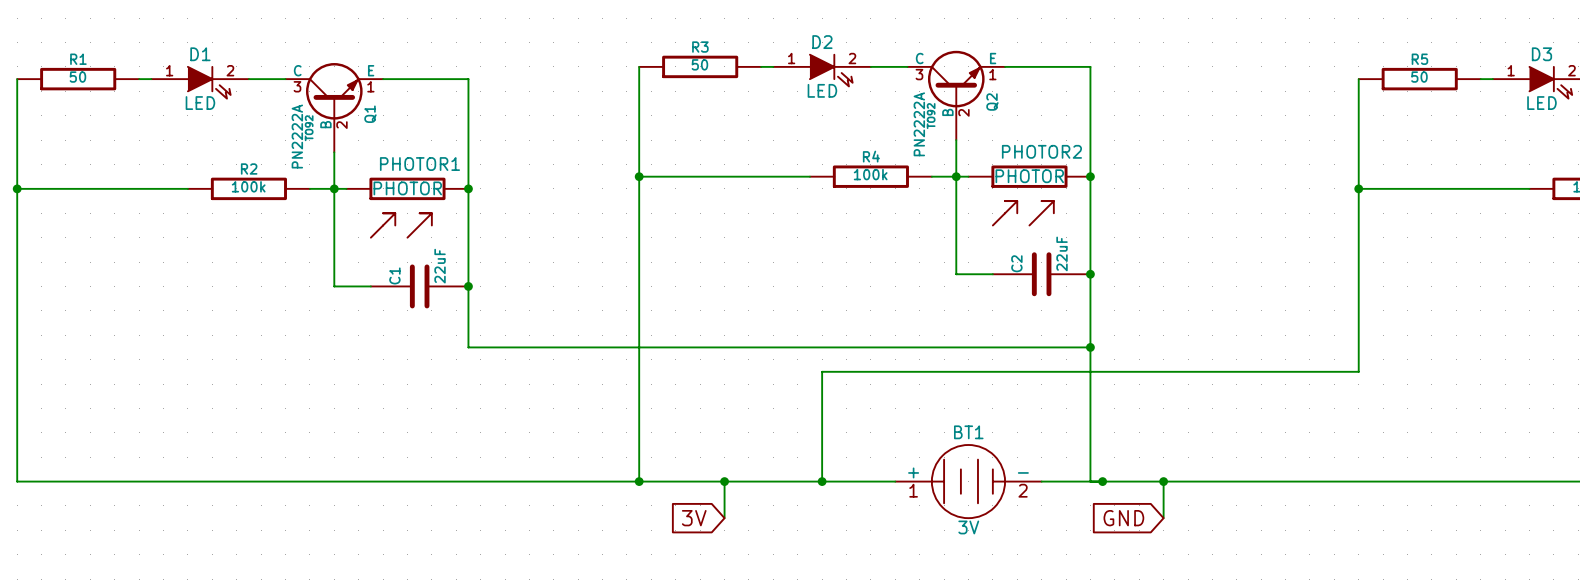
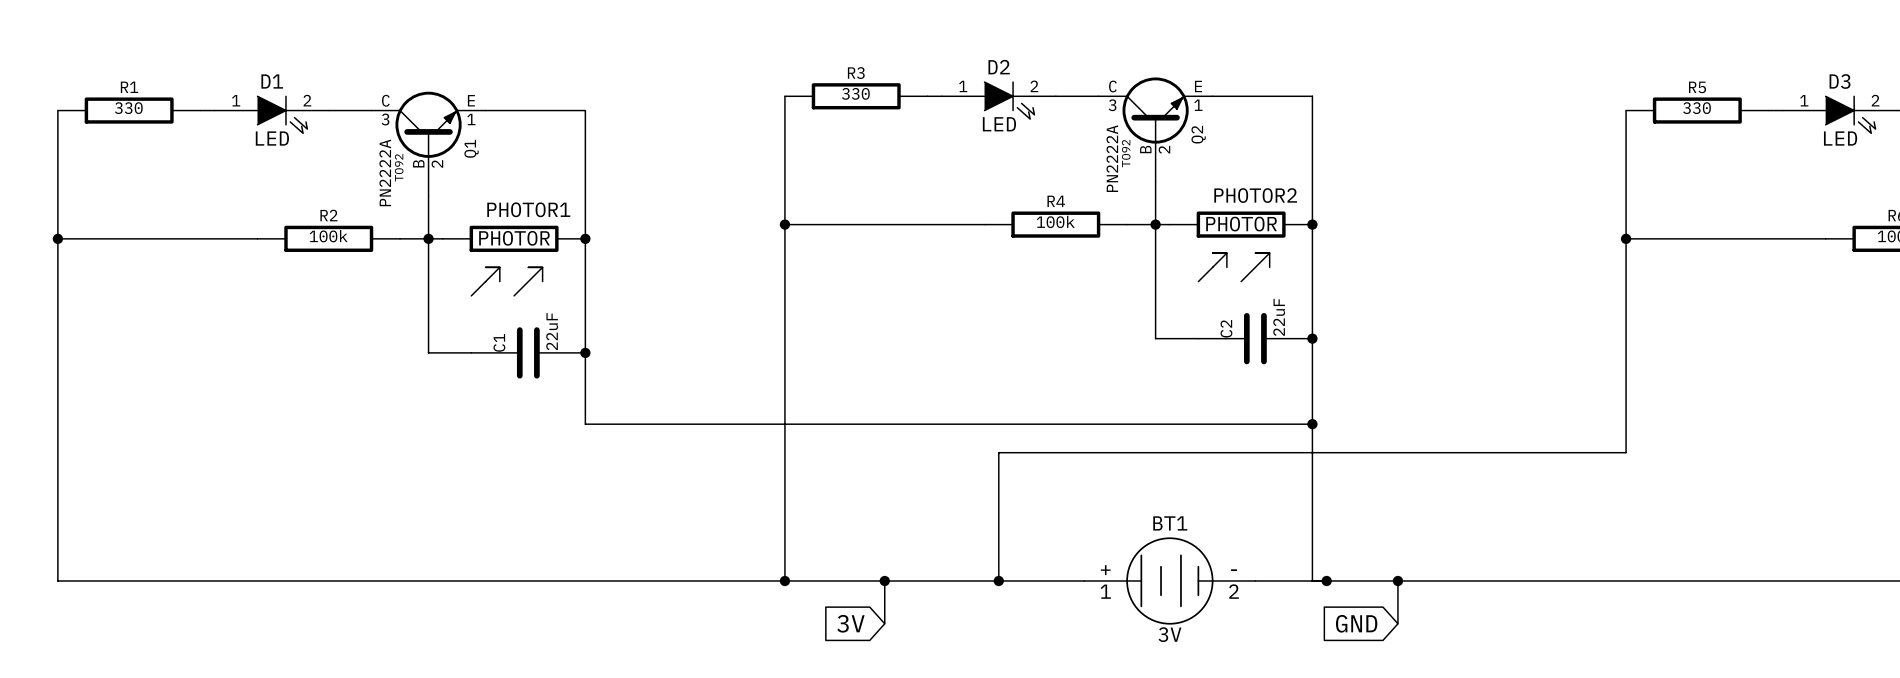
R3 value: 50 (699, 64) -> 330 (855, 93)
R1 value: 50 (77, 77) -> 330 (128, 108)
R5 value: 50 (1419, 77) -> 330 (1696, 108)

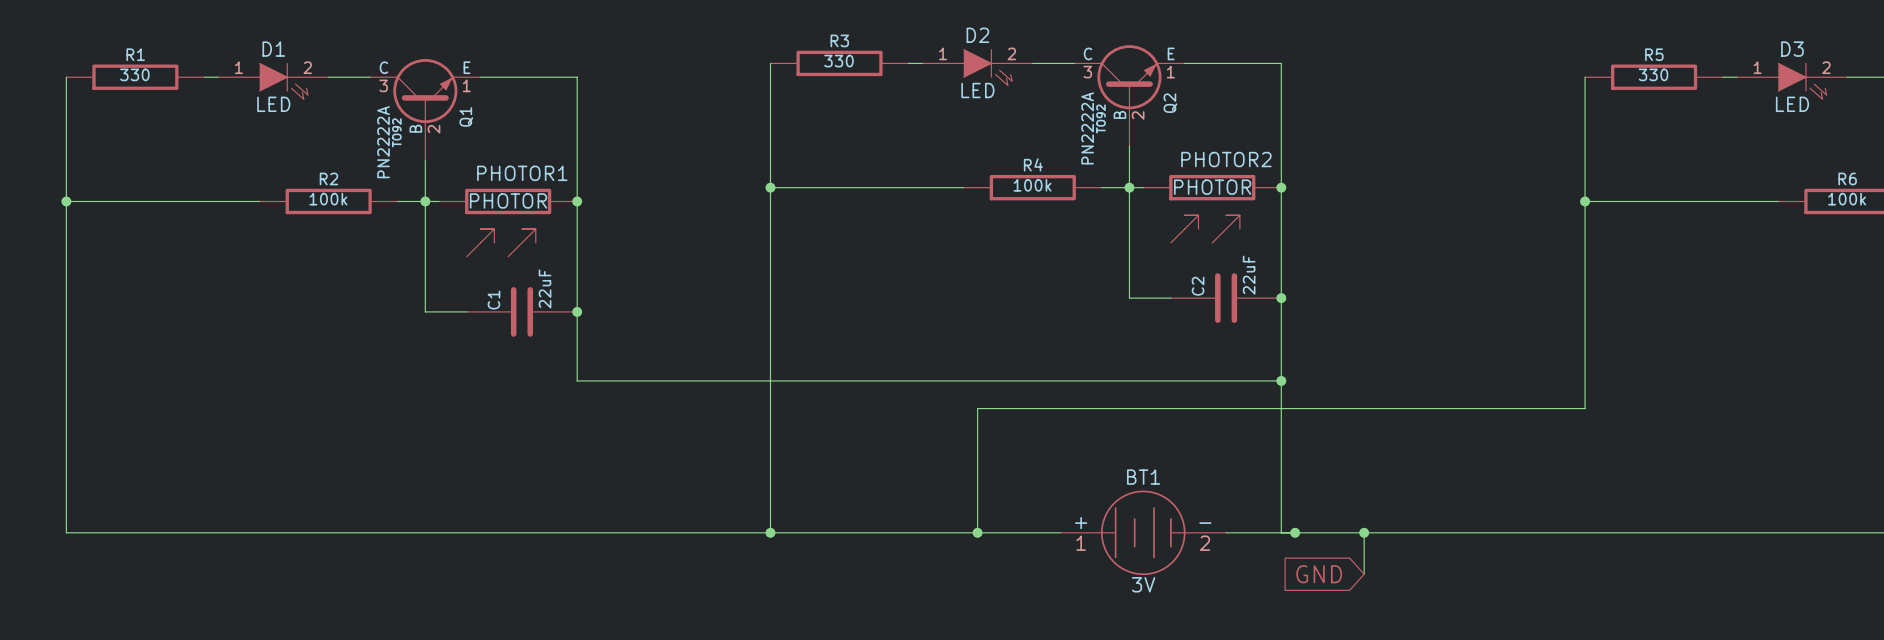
wire: (884, 581) (884, 623) -> none
junction: (884, 581) -> none
global label: 3V (850, 623) -> none

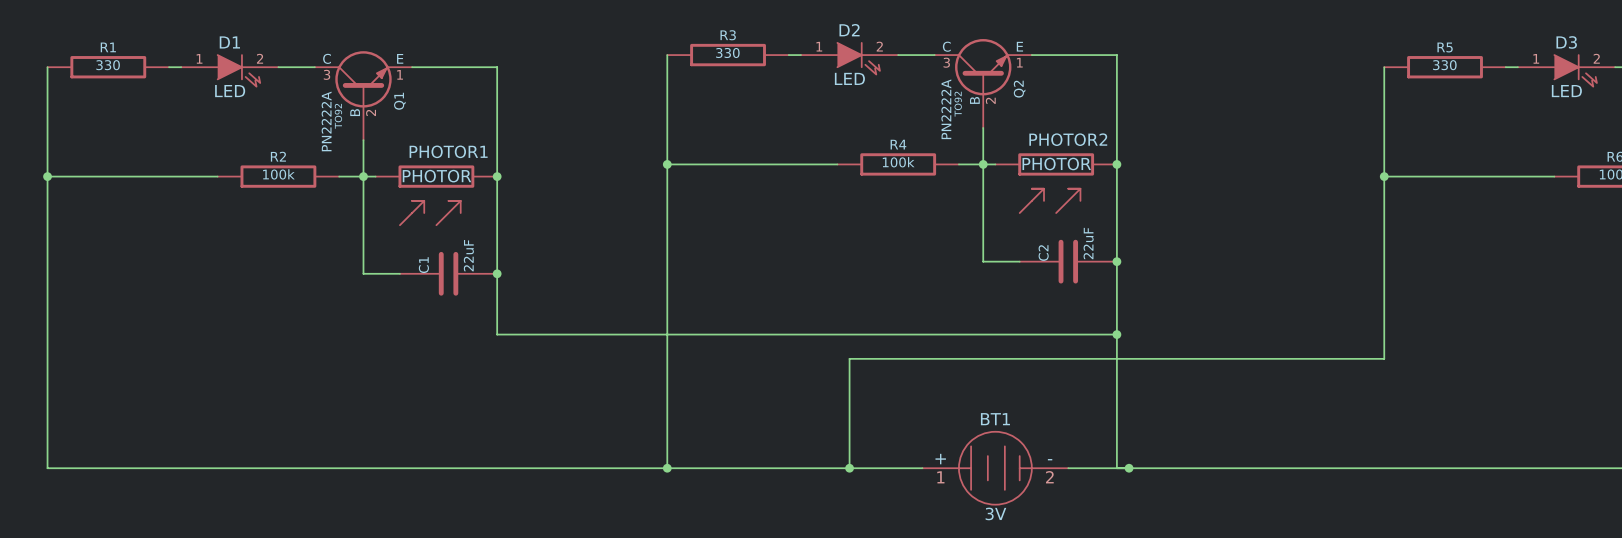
wire: (1364, 532) (1364, 574) -> none
junction: (1364, 532) -> none
global label: GND (1319, 574) -> none

